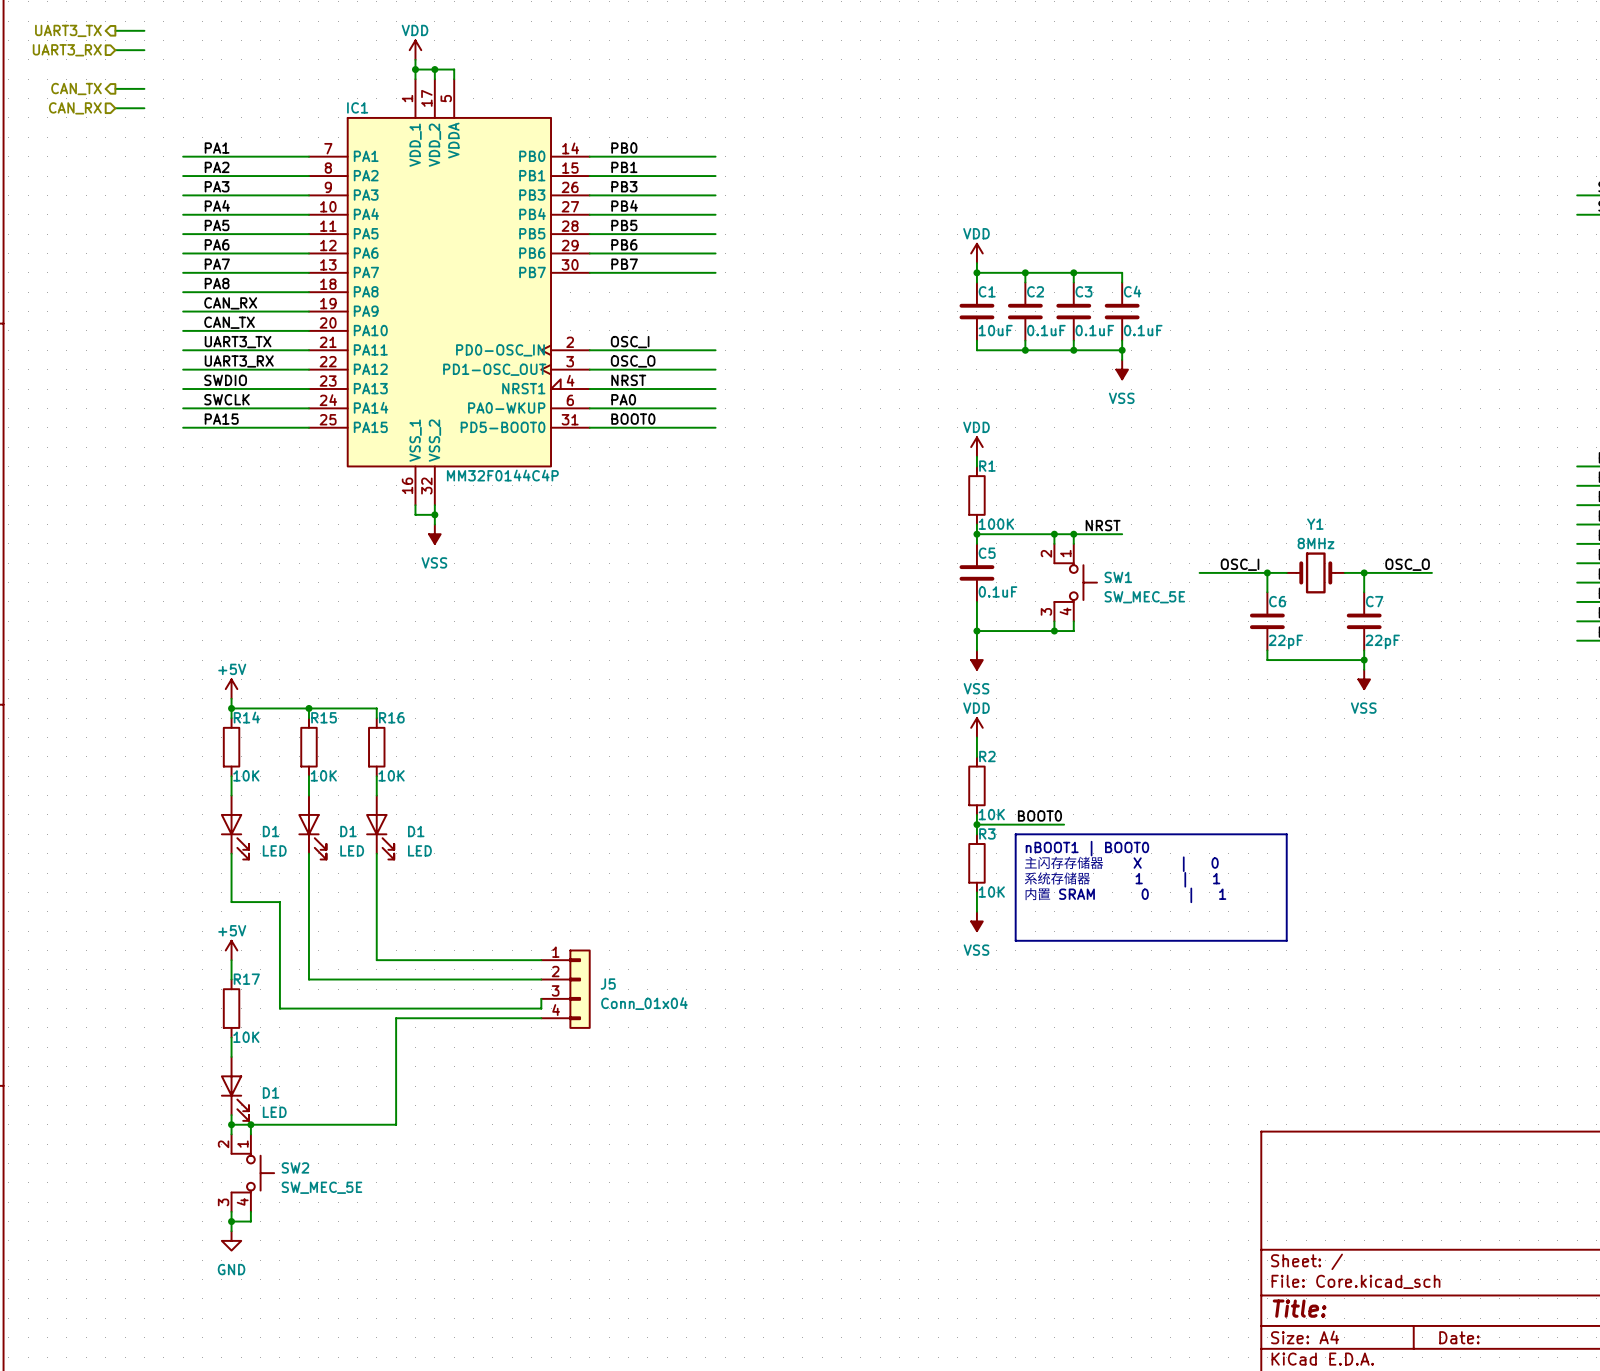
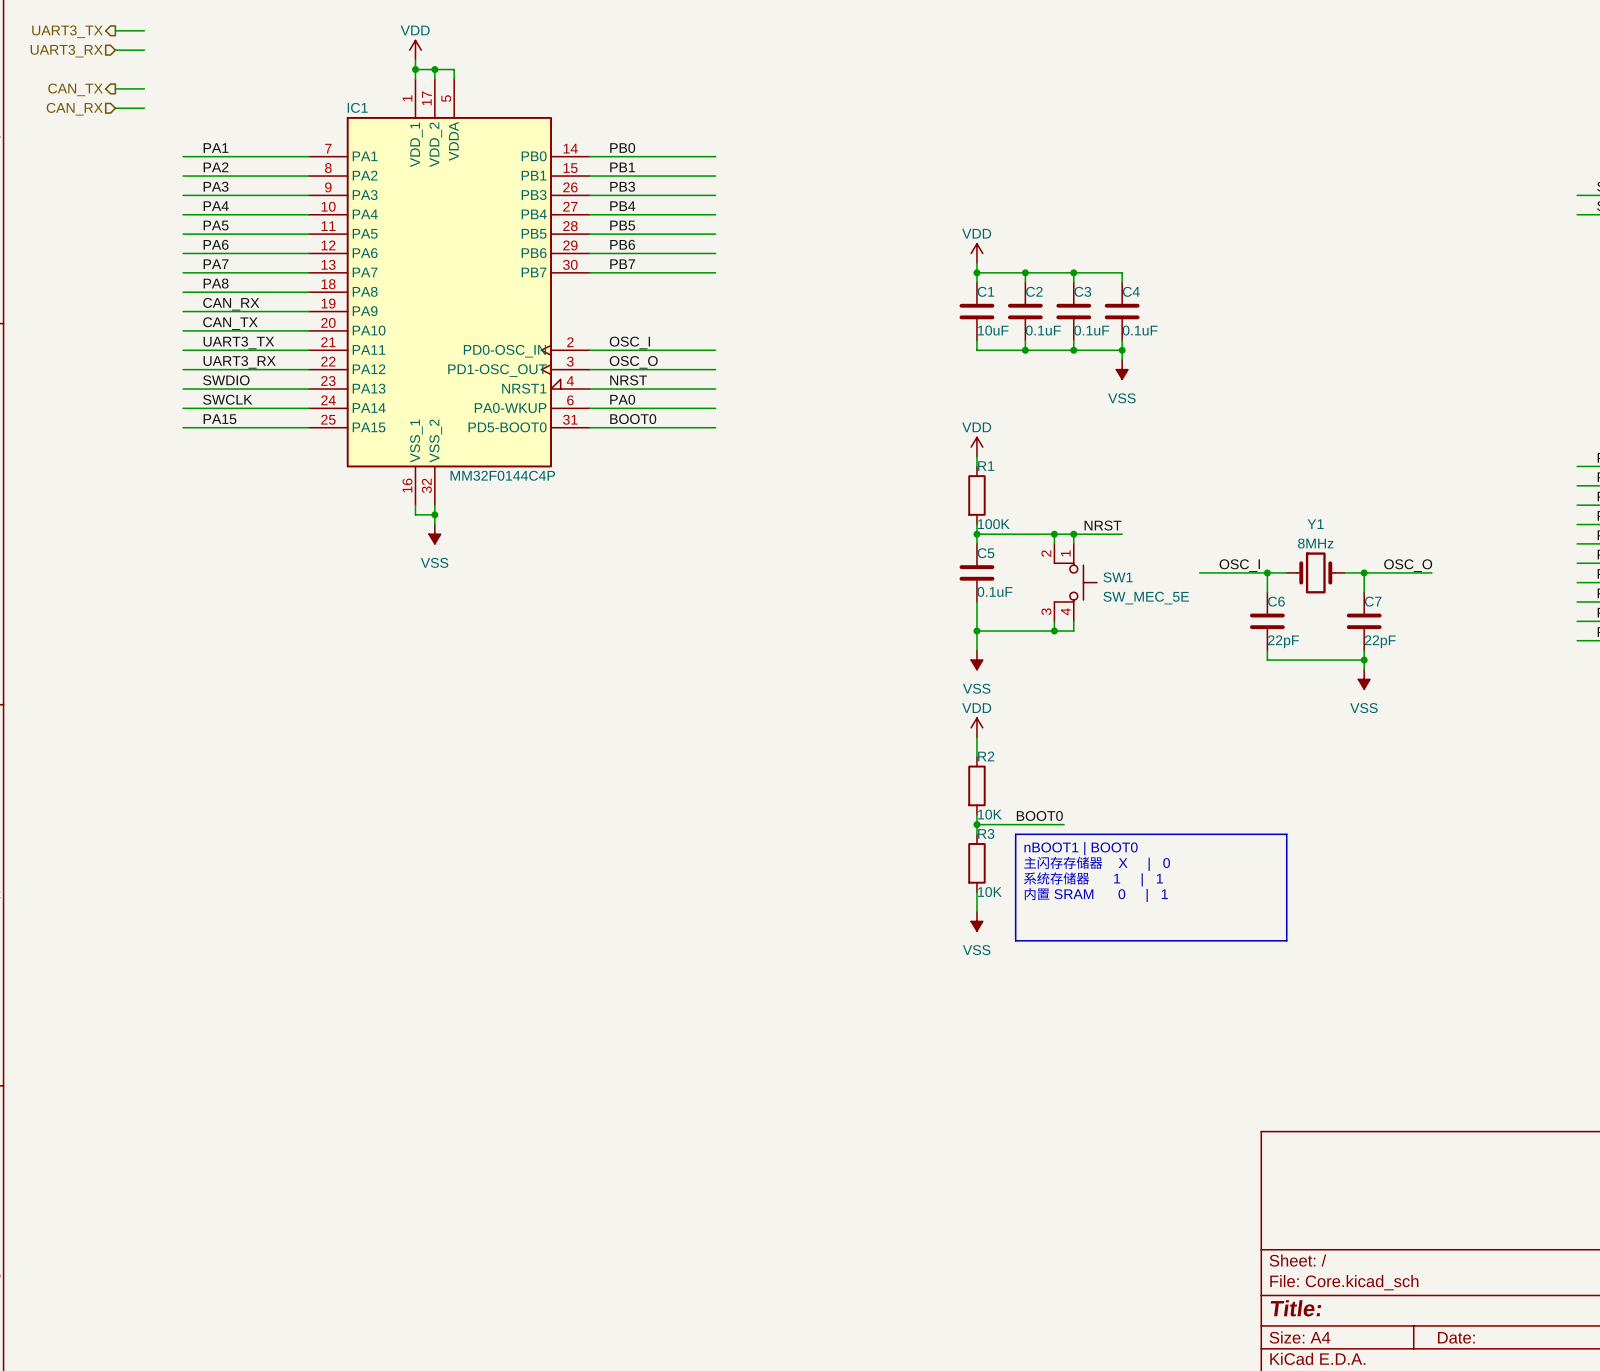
power symbol: +5V (231, 689) -> none
wire: (231, 698) (231, 718) -> none
wire: (231, 708) (376, 708) (376, 718) -> none
junction: (231, 708) -> none
wire: (308, 708) (308, 718) -> none
junction: (308, 708) -> none
R14: 10K (231, 747) -> none
R15: 10K (308, 747) -> none
R16: 10K (376, 747) -> none
wire: (231, 776) (231, 795) -> none
wire: (308, 776) (308, 795) -> none
wire: (376, 776) (376, 795) -> none
D1: LED (234, 827) -> none
D1: LED (312, 827) -> none
D1: LED (380, 827) -> none
wire: (231, 853) (231, 902) (279, 902) (279, 1008) (541, 1008) (541, 998) -> none
wire: (308, 853) (308, 979) (541, 979) -> none
wire: (376, 853) (376, 960) (541, 960) -> none
power symbol: +5V (231, 950) -> none
wire: (231, 960) (231, 979) -> none
J5: Conn_01x04 (566, 989) -> none
R17: 10K (231, 1008) -> none
wire: (541, 1018) (396, 1018) (396, 1124) (231, 1124) -> none
wire: (231, 1037) (231, 1056) -> none
D1: LED (234, 1088) -> none
wire: (231, 1115) (231, 1134) -> none
junction: (231, 1124) -> none
wire: (250, 1124) (250, 1134) -> none
junction: (250, 1124) -> none
SW2: SW_MEC_5E (252, 1173) -> none
wire: (231, 1211) (231, 1231) -> none
wire: (250, 1211) (250, 1221) (231, 1221) -> none
junction: (231, 1221) -> none
power symbol: GND (231, 1240) -> none

